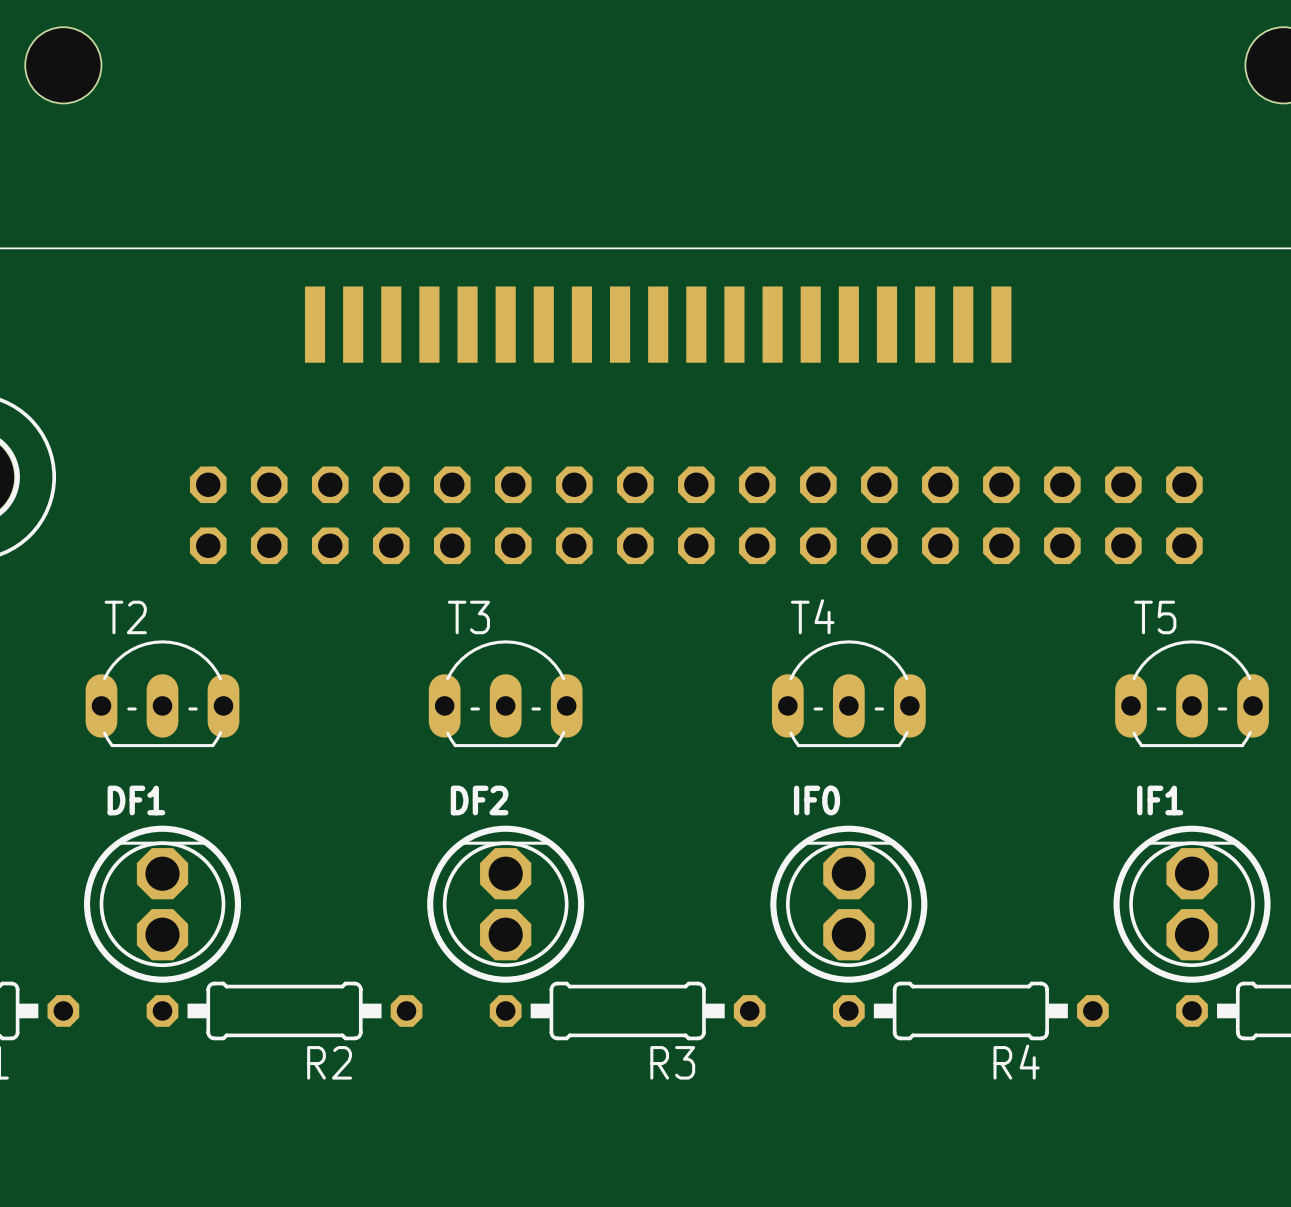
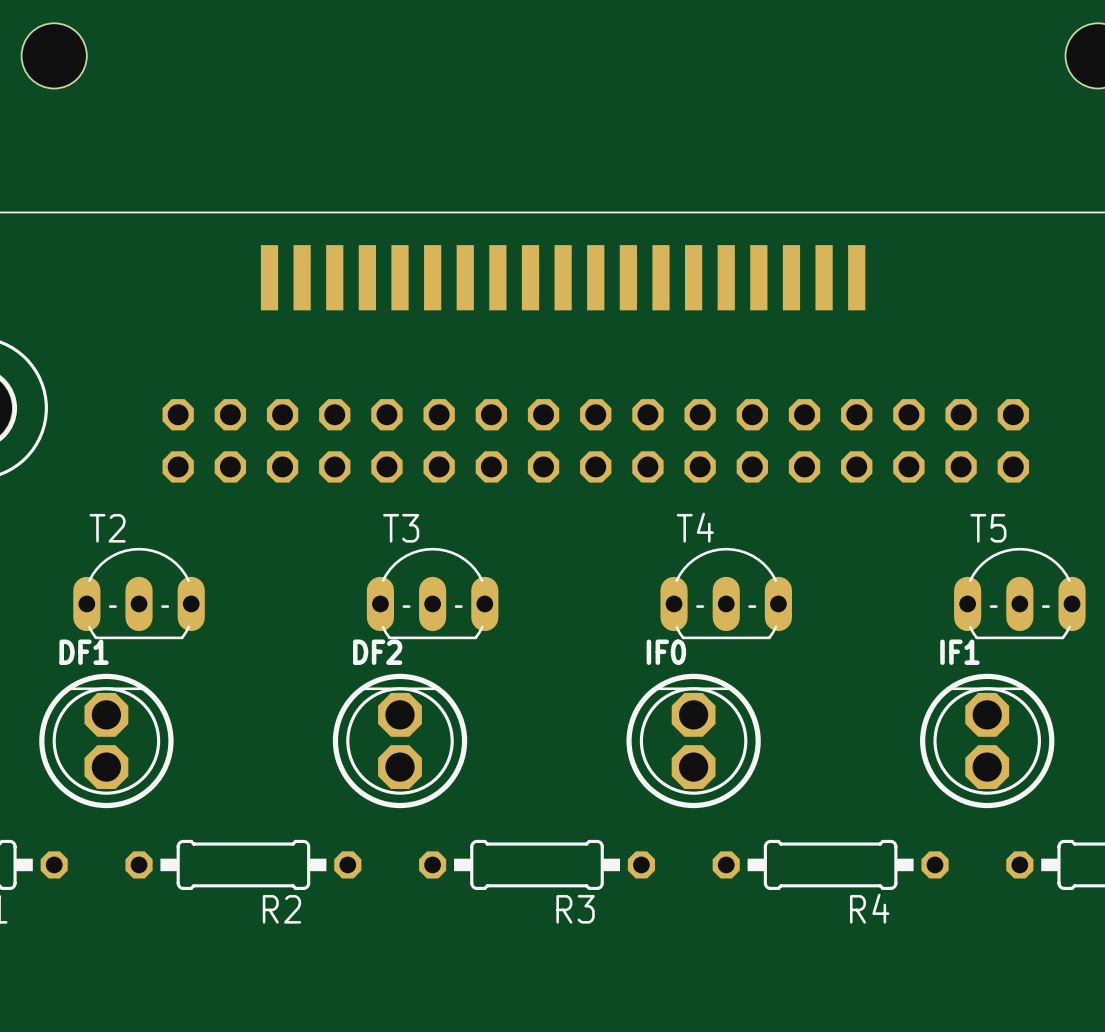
DF1 position: (162, 904) -> (106, 740)
DF2 position: (505, 904) -> (400, 740)
IF0 position: (848, 904) -> (693, 740)
IF1 position: (1192, 904) -> (987, 740)

